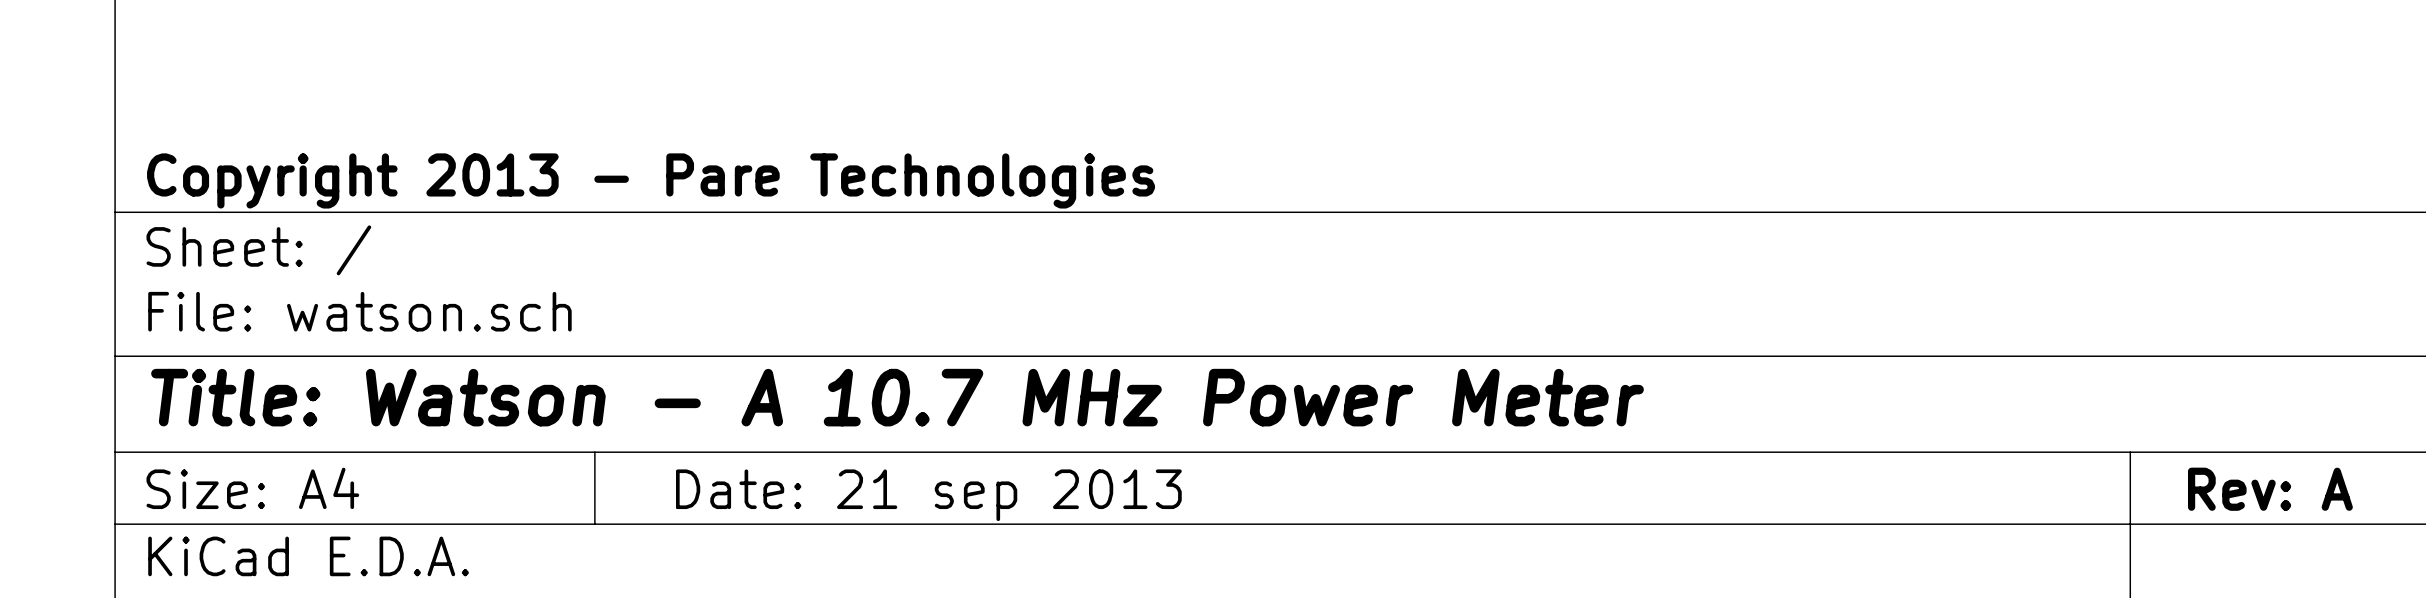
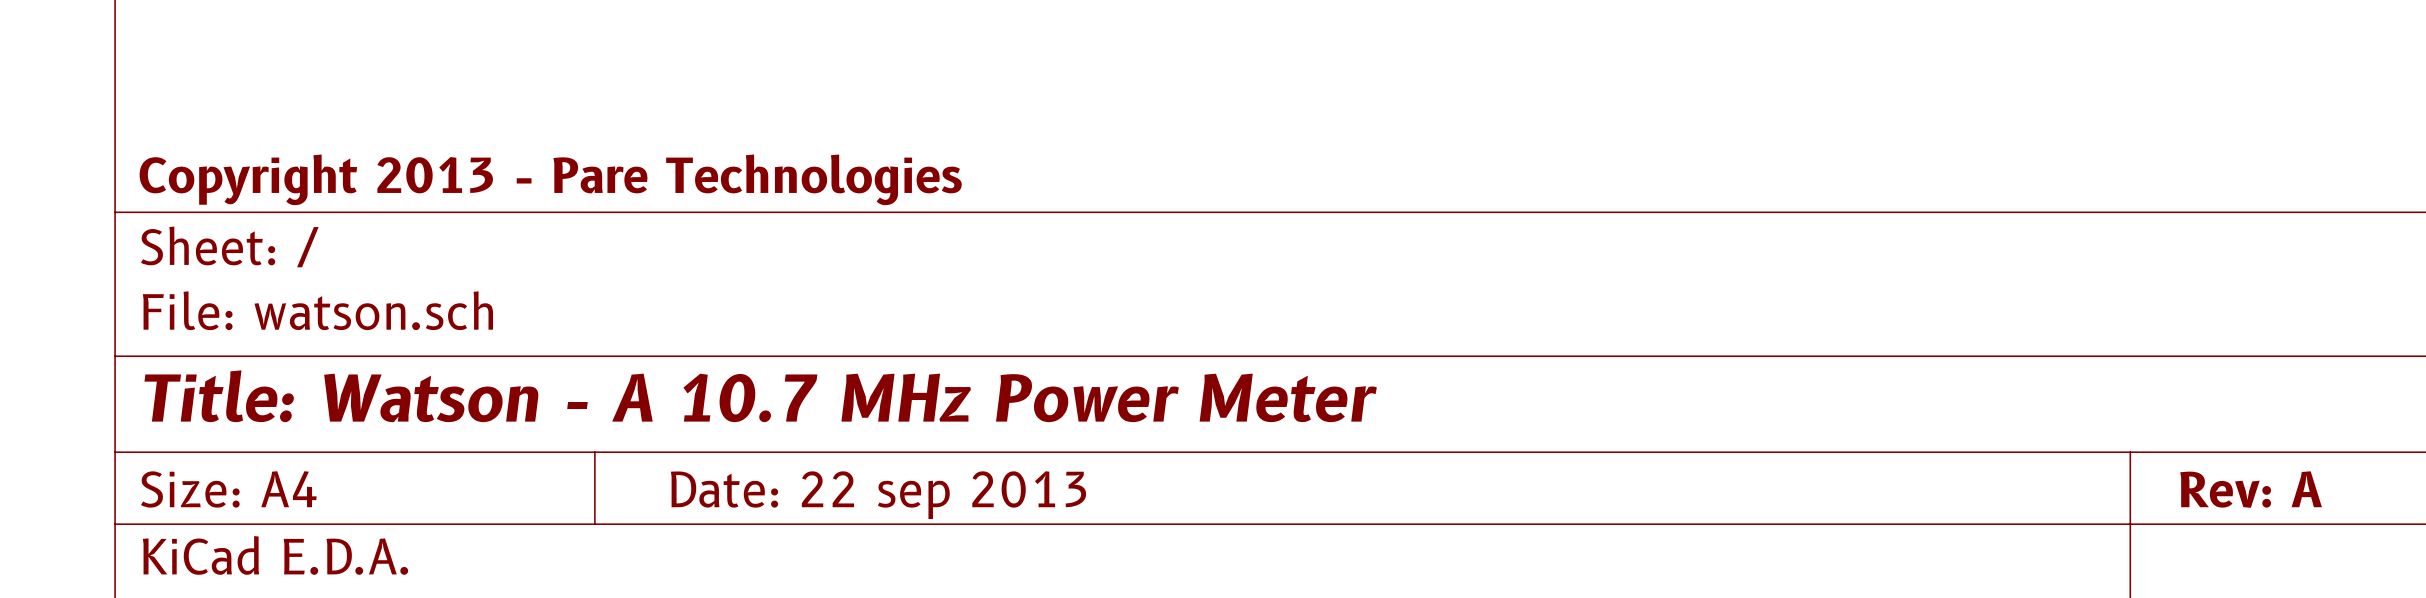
title block: Date: 21 sep 2013 (928, 495) -> Date: 22 sep 2013 (878, 495)

